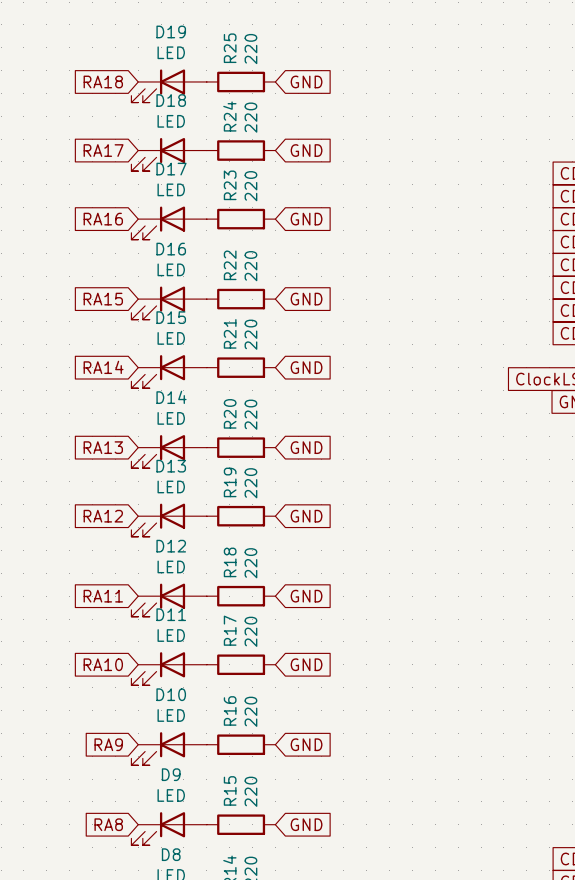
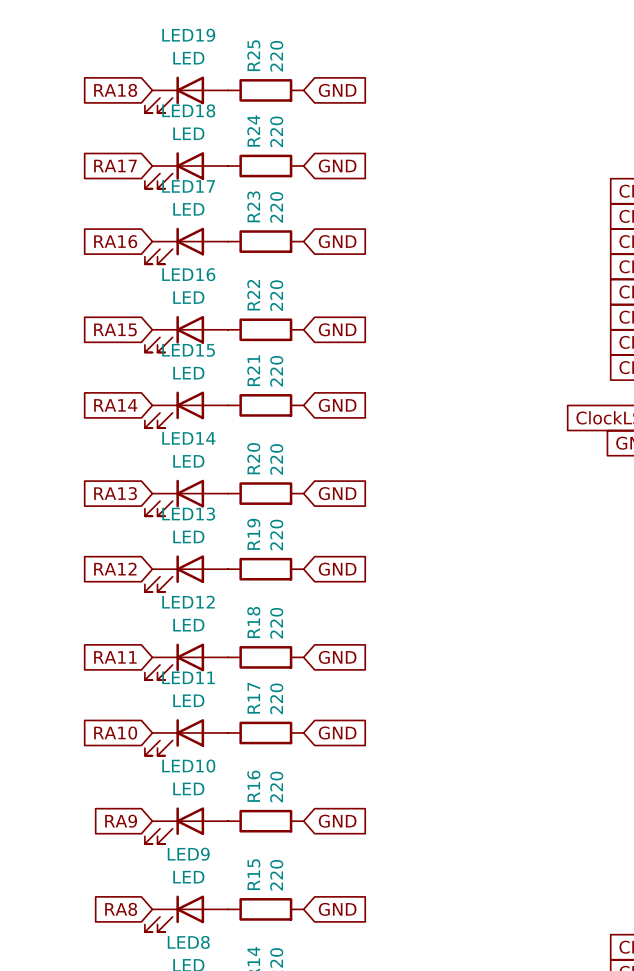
D19 name: D19 (171, 31) -> LED19 (188, 35)
D18 name: D18 (171, 100) -> LED18 (188, 110)
D17 name: D17 (171, 169) -> LED17 (188, 186)
D16 name: D16 (171, 249) -> LED16 (188, 274)
D15 name: D15 (171, 317) -> LED15 (188, 350)
D14 name: D14 (171, 397) -> LED14 (188, 438)
D13 name: D13 (171, 466) -> LED13 (188, 514)
D12 name: D12 (171, 546) -> LED12 (188, 602)
D11 name: D11 (171, 614) -> LED11 (188, 677)
D10 name: D10 (171, 694) -> LED10 (188, 766)
D9 name: D9 (171, 774) -> LED9 (188, 854)
D8 name: D8 (171, 854) -> LED8 (188, 942)

